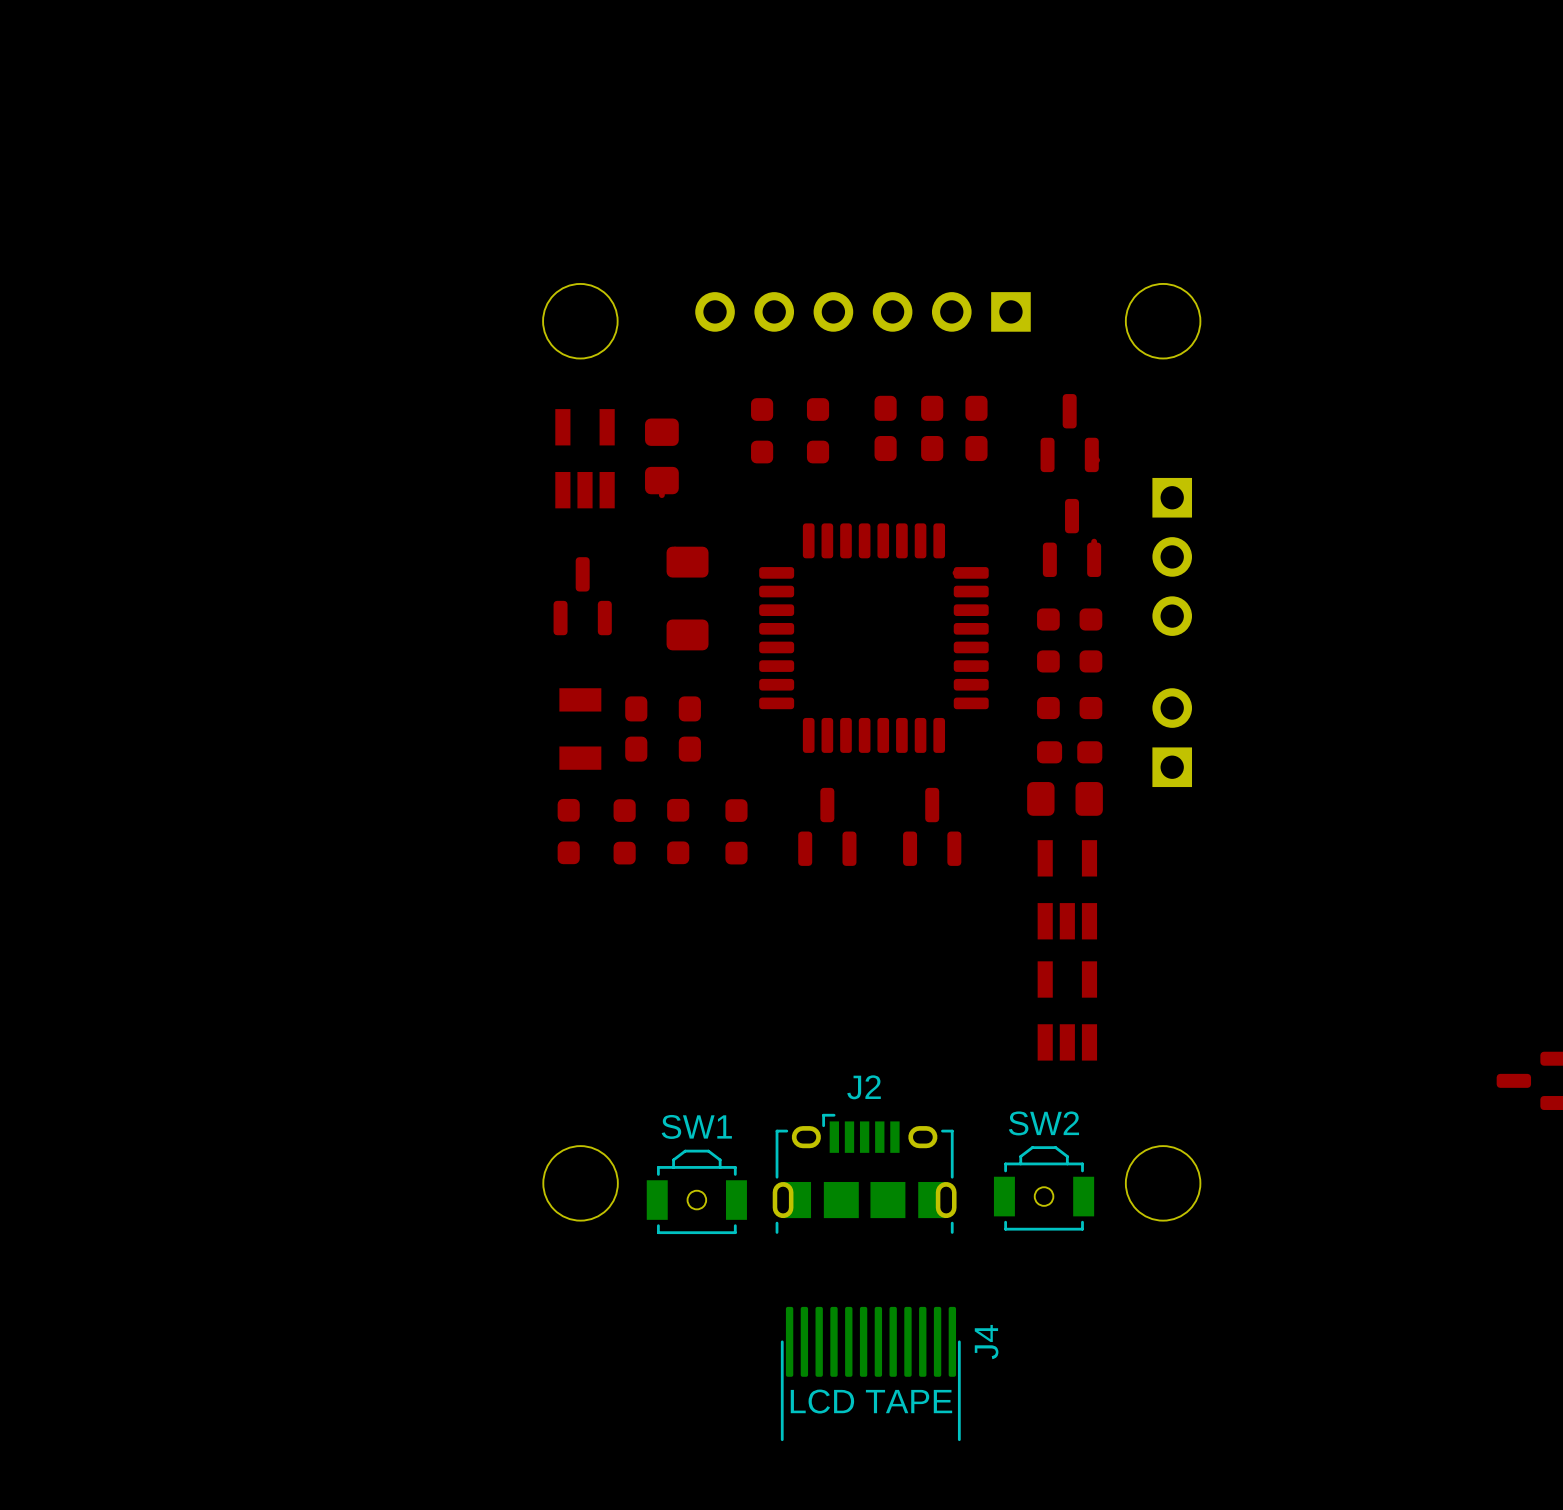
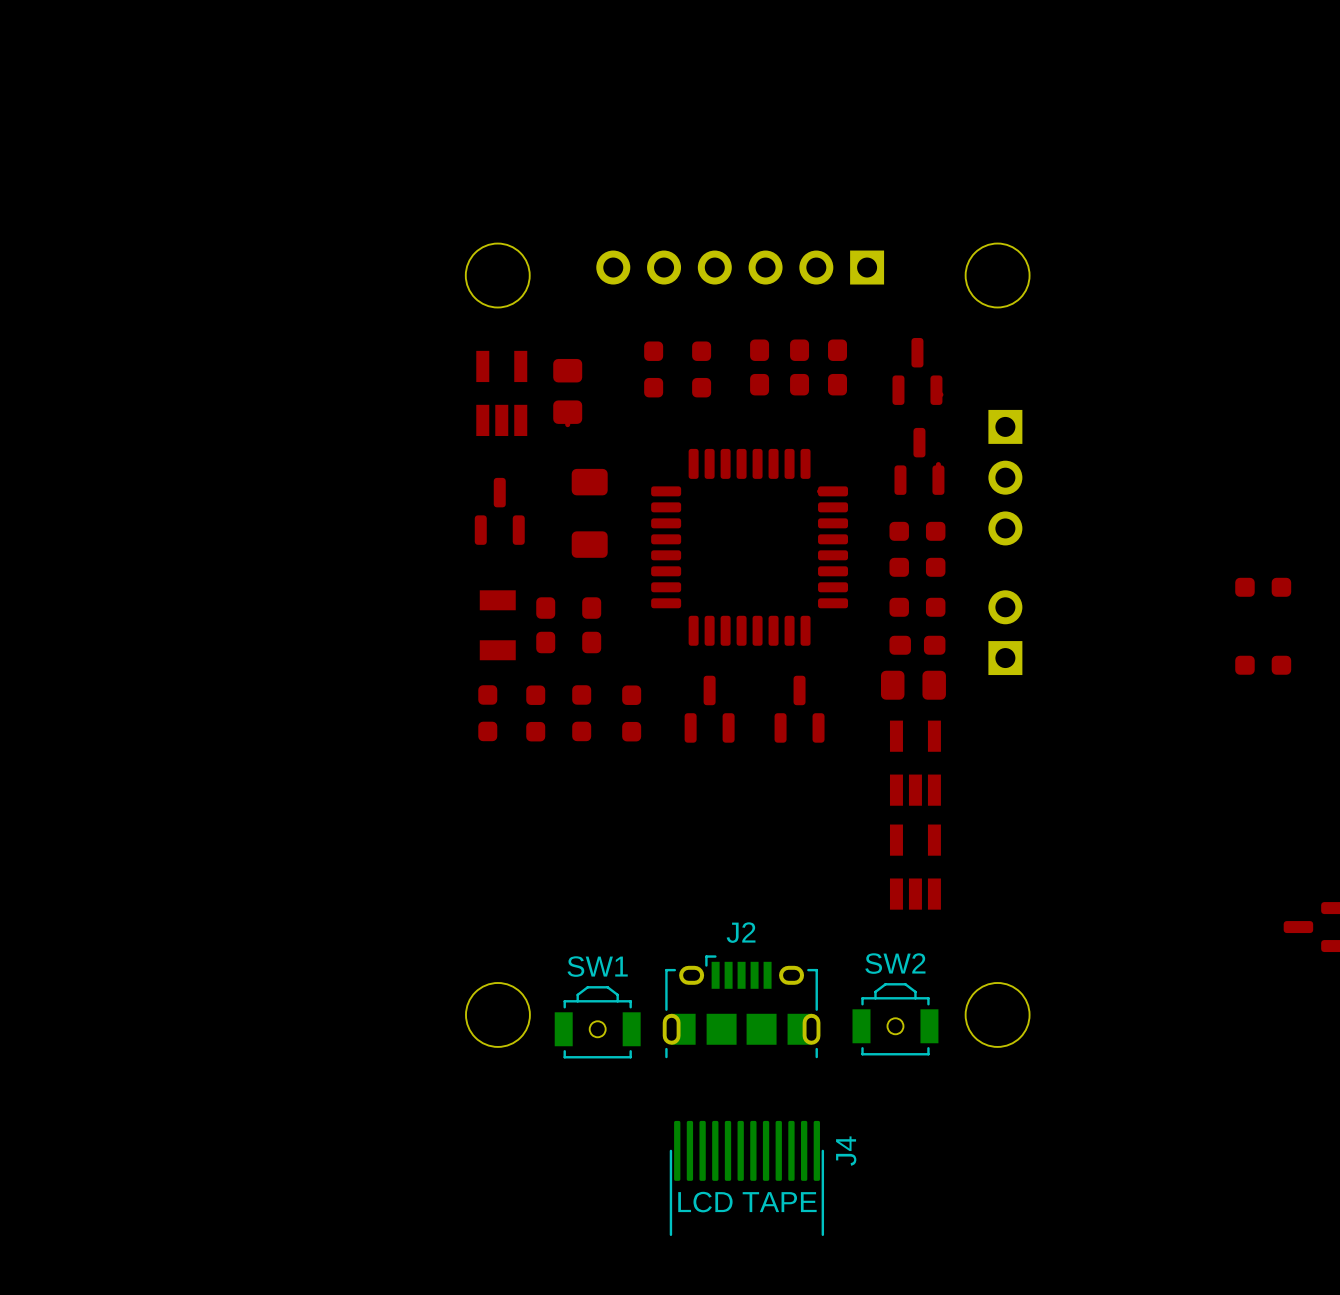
part: none -> (1263, 587)
part: none -> (1263, 665)

